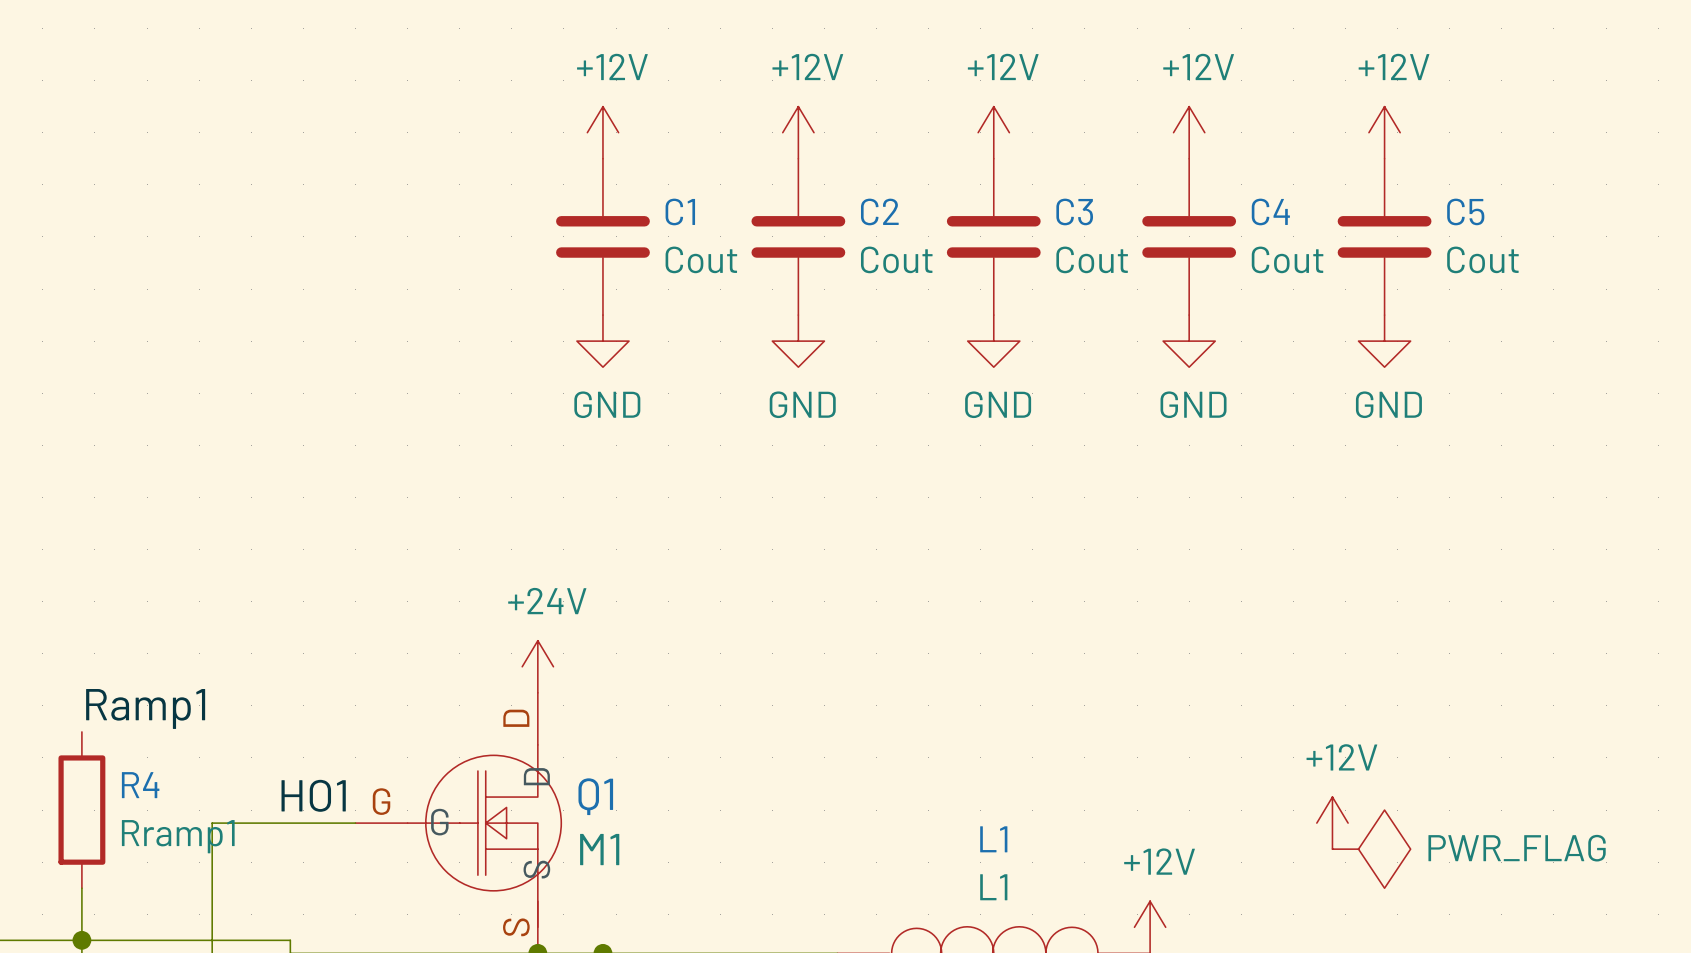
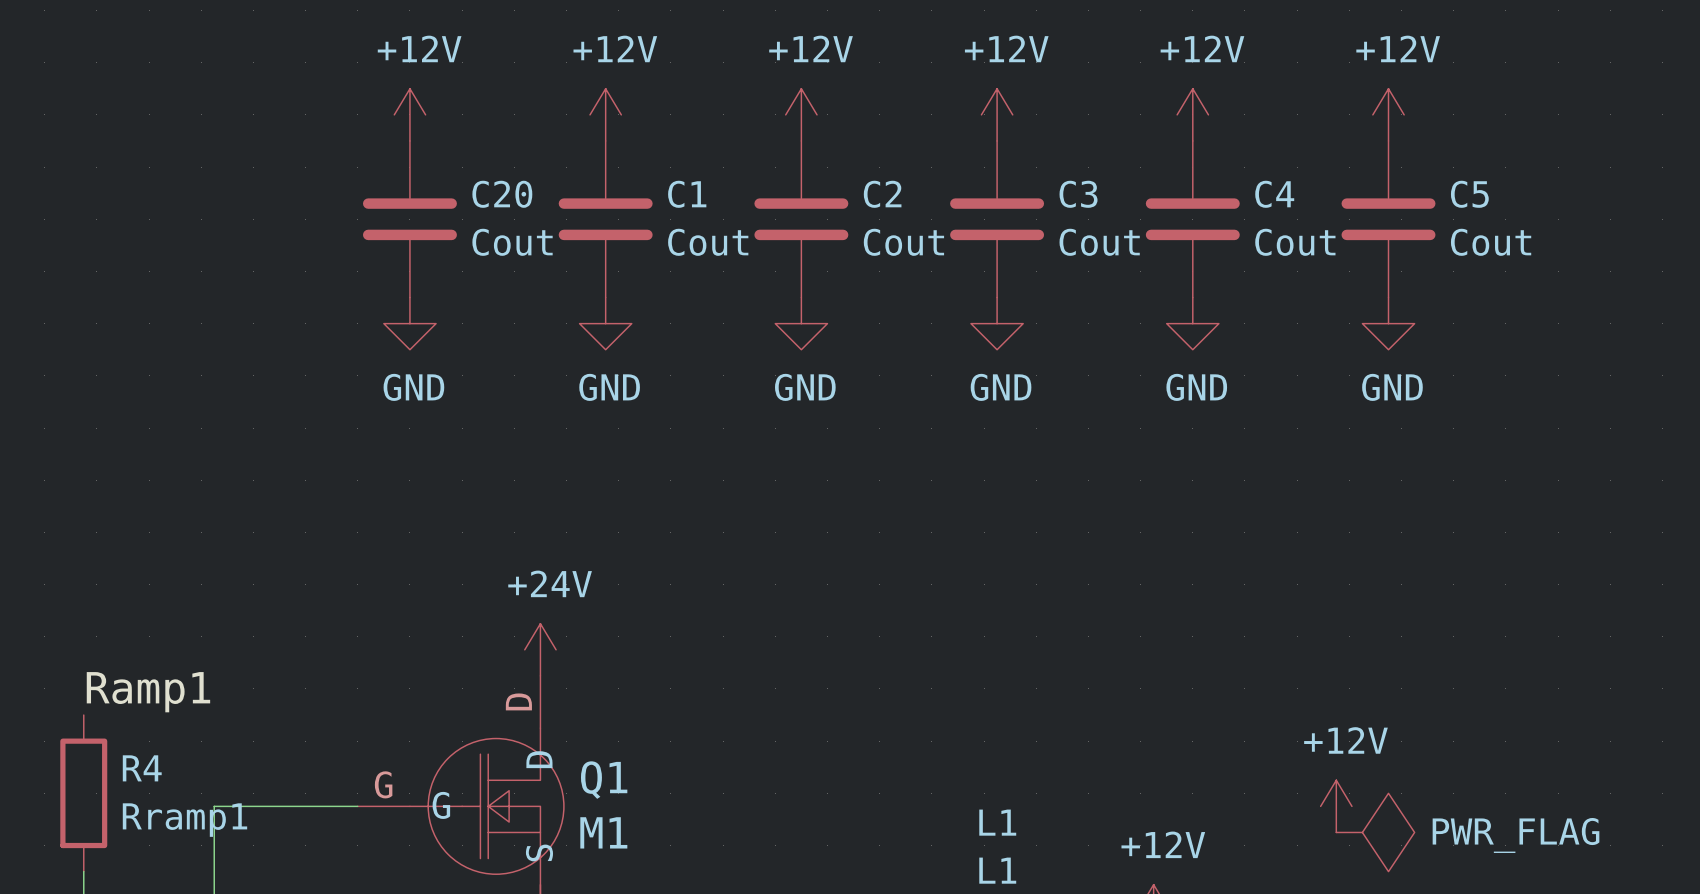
power symbol: none -> +12V (409, 114)
C20: none -> Cout (409, 219)
power symbol: none -> GND (409, 323)
label: HO1 (313, 795) -> none

